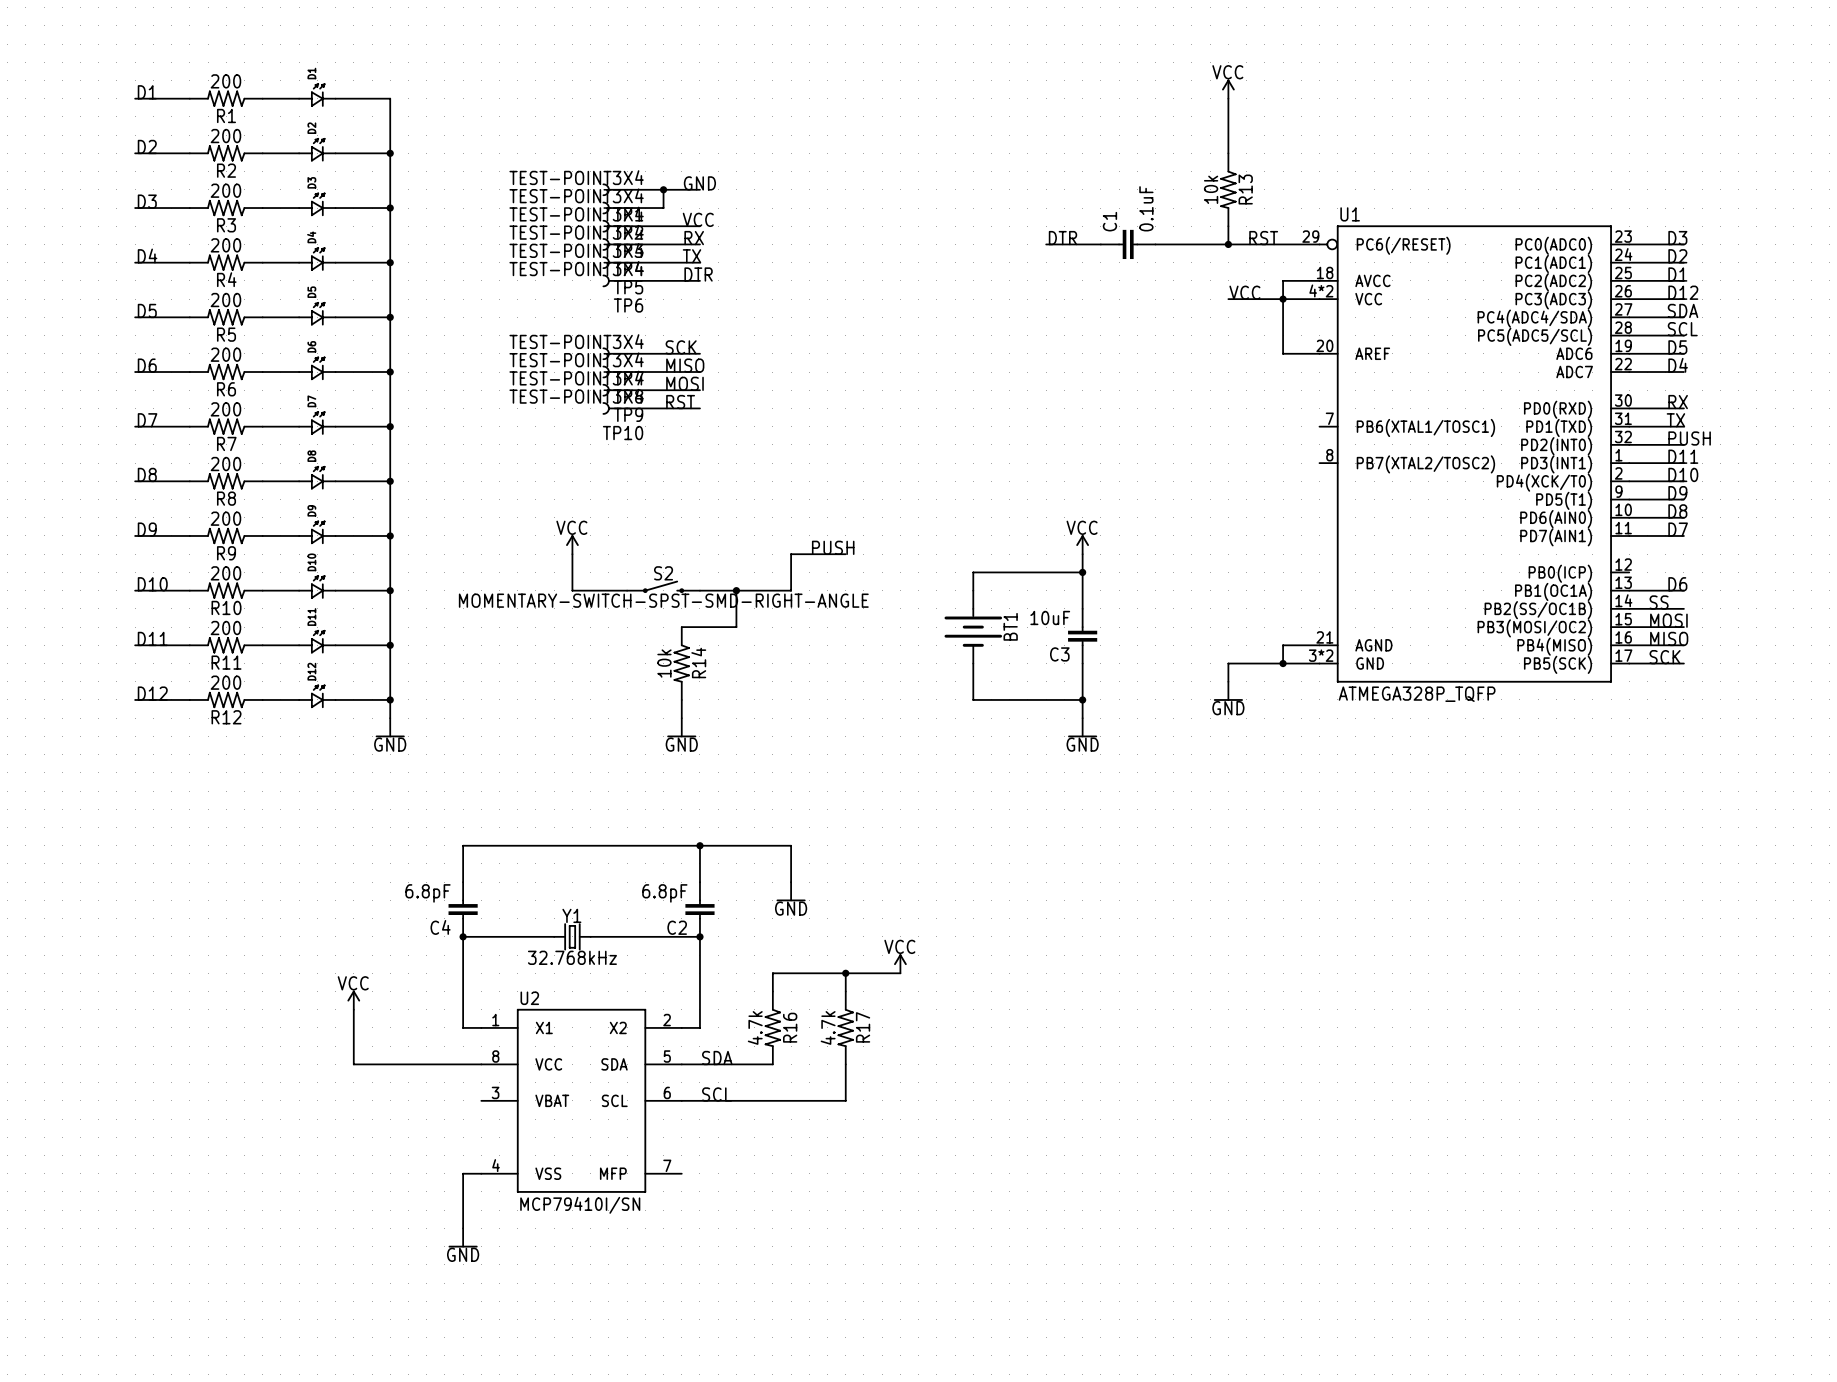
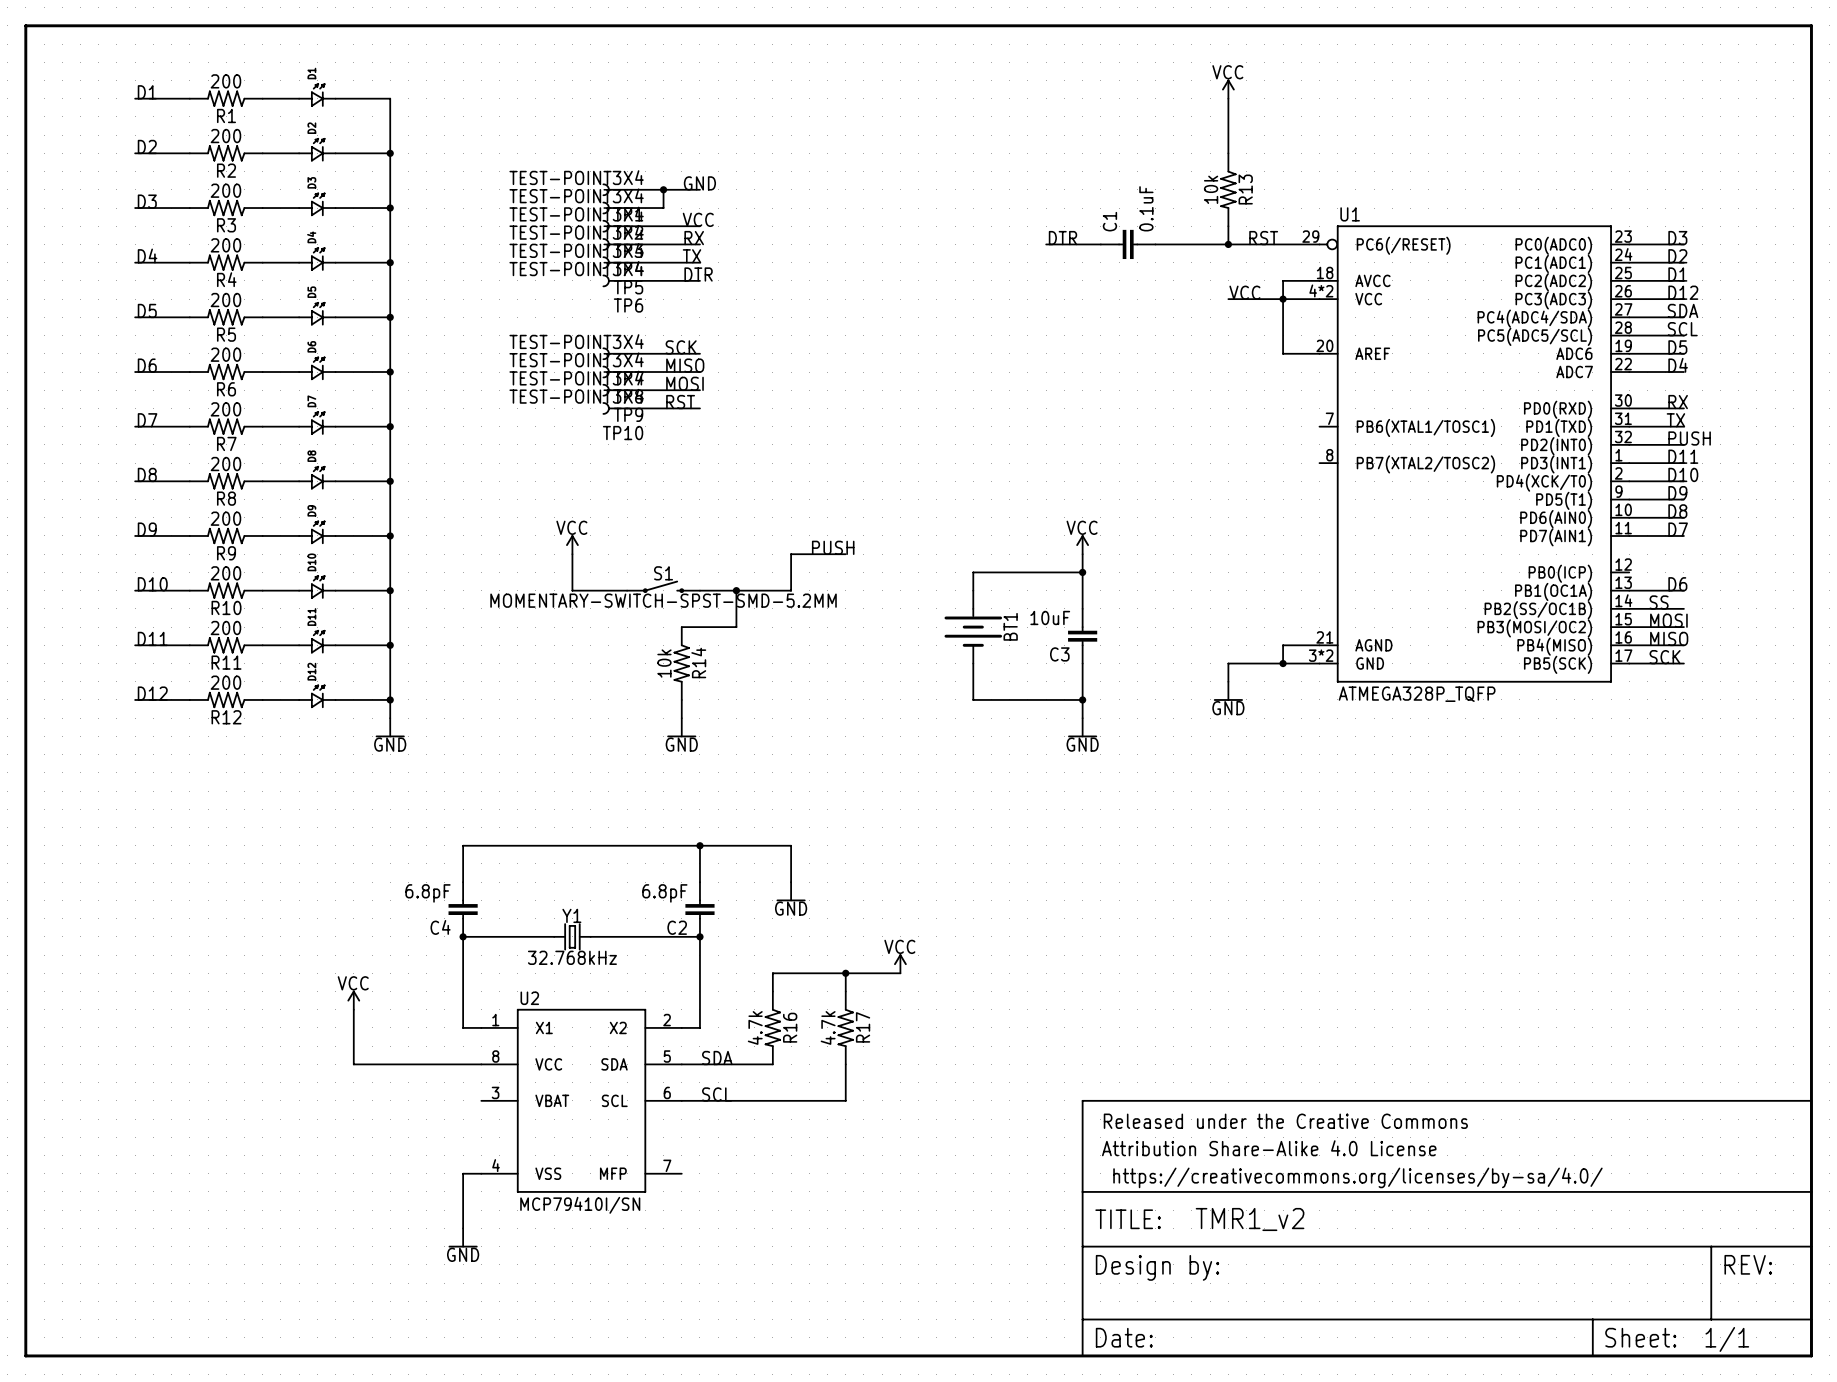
S2 name: S2 (663, 573) -> S1 (663, 573)
S2 value: MOMENTARY-SWITCH-SPST-SMD-RIGHT-ANGLE (663, 600) -> MOMENTARY-SWITCH-SPST-SMD-5.2MM (663, 600)
part: none -> (918, 690)
part: none -> (1447, 1228)

